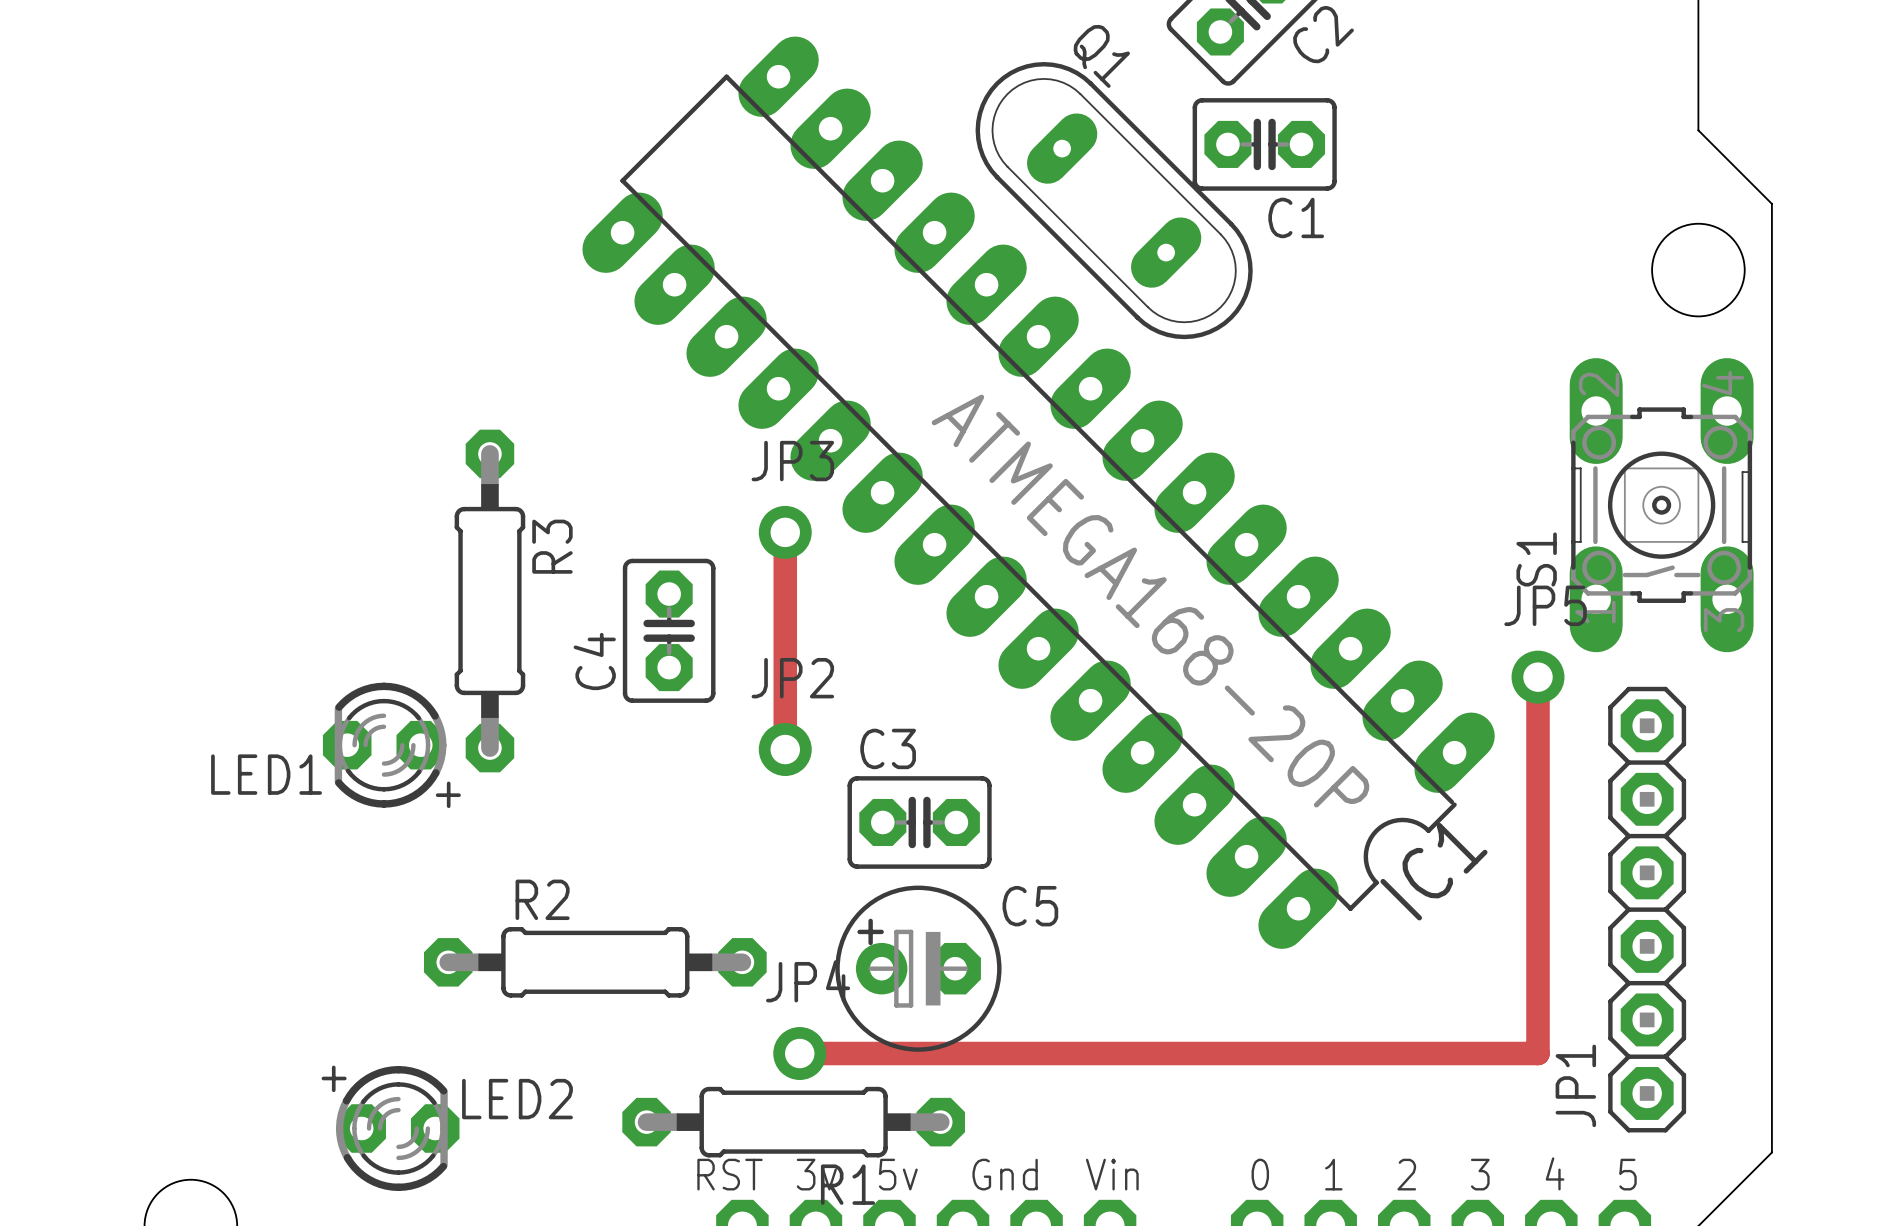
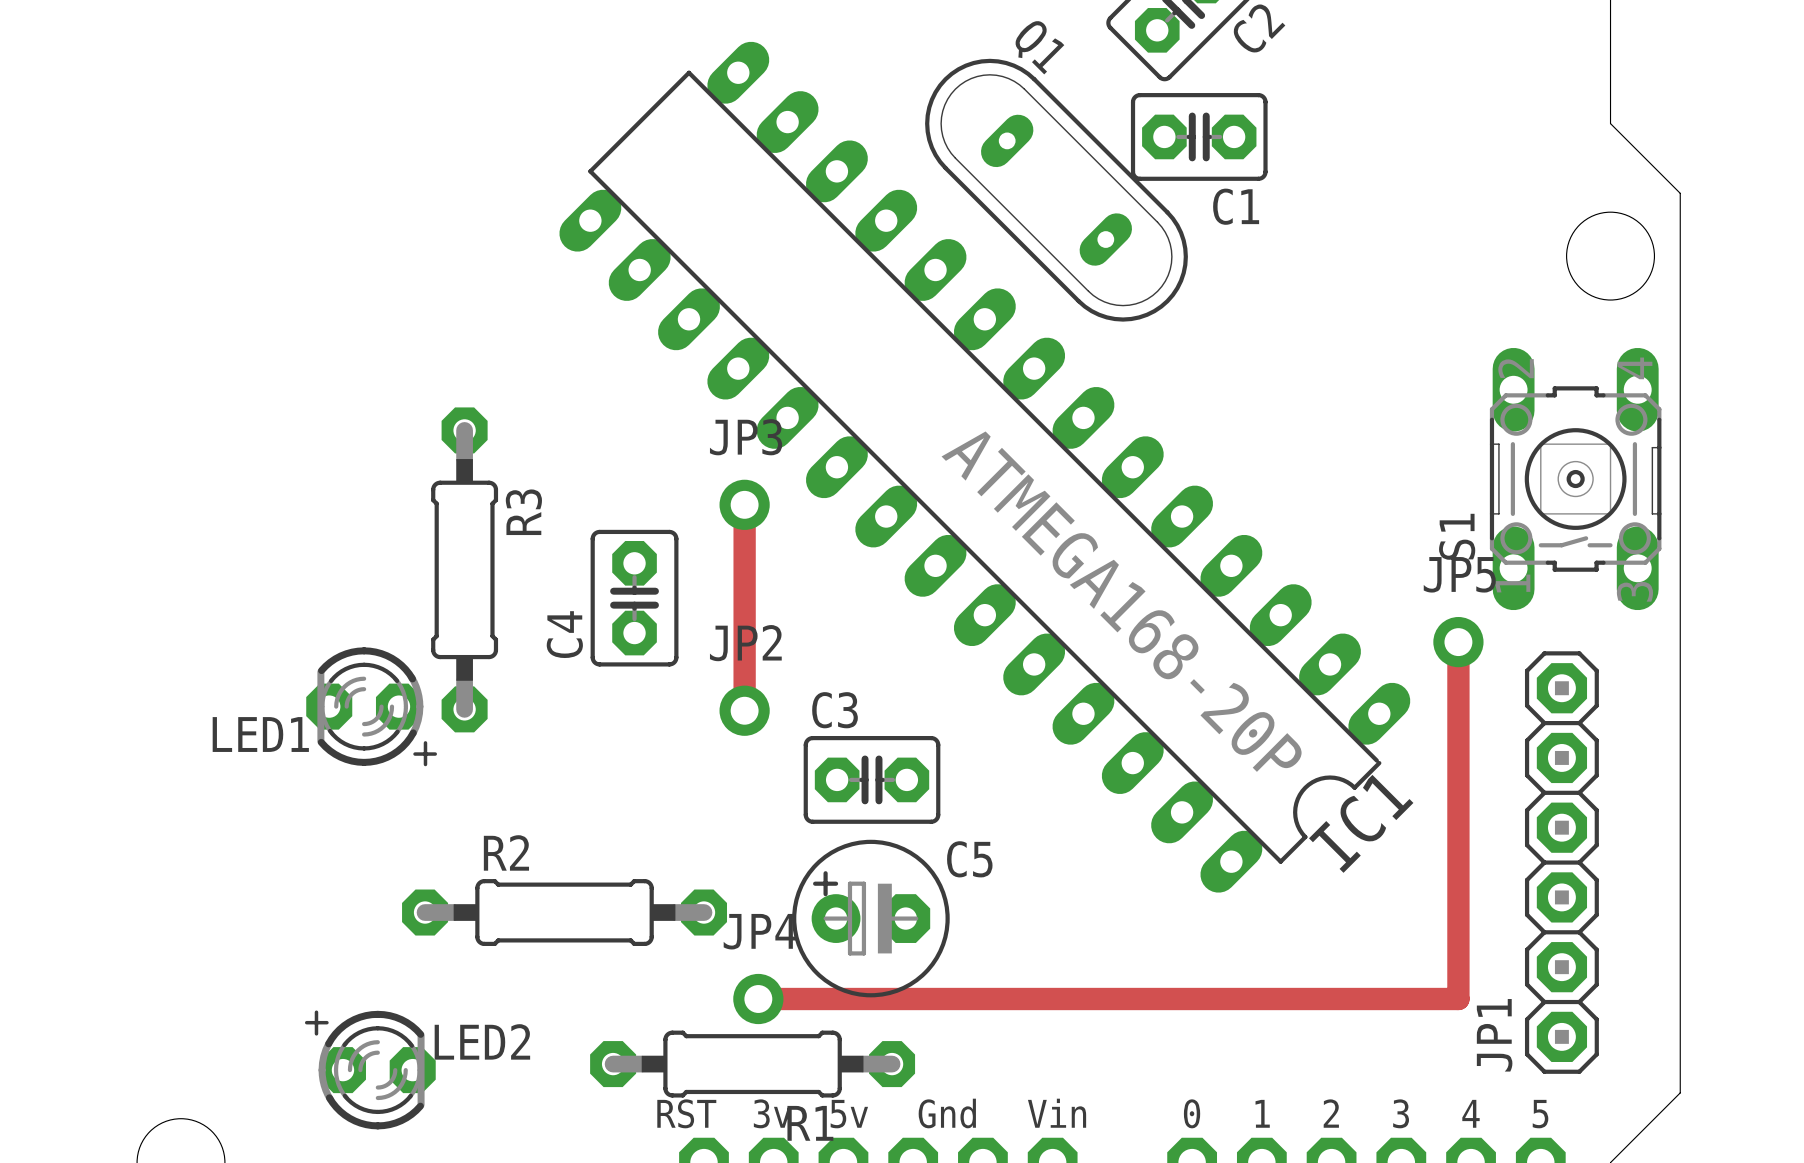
IC1 footprint: [582, 36, 1495, 949] -> [559, 41, 1411, 893]
Q1 footprint: [975, 62, 1253, 340] -> [925, 58, 1188, 322]
S1 footprint: [1569, 358, 1754, 653] -> [1489, 347, 1662, 611]

